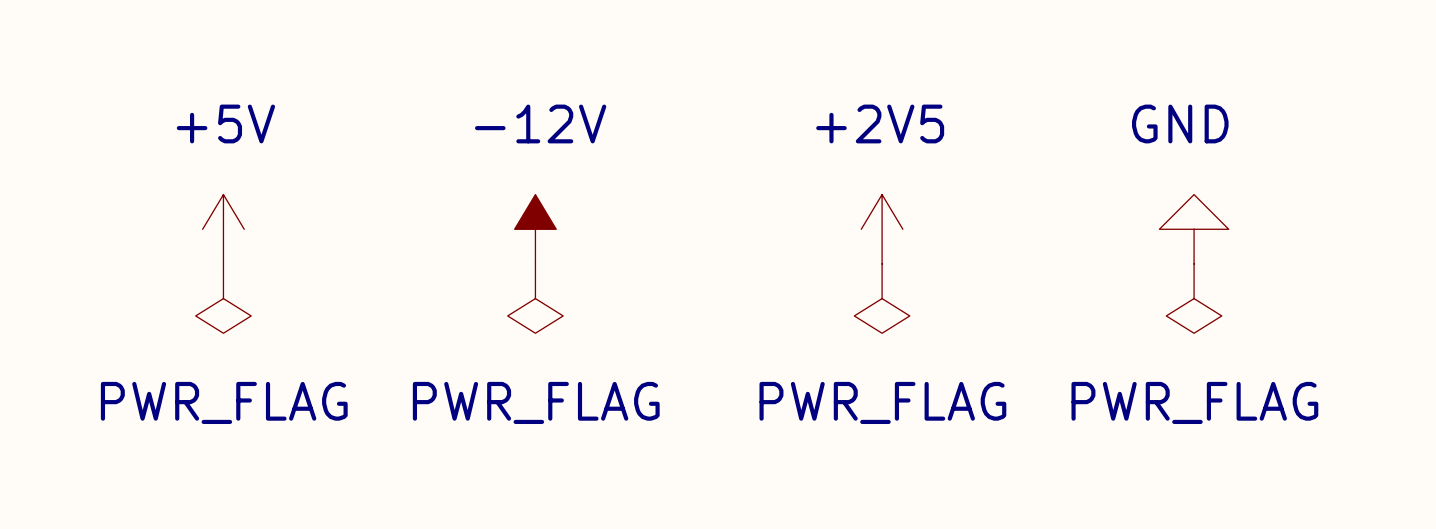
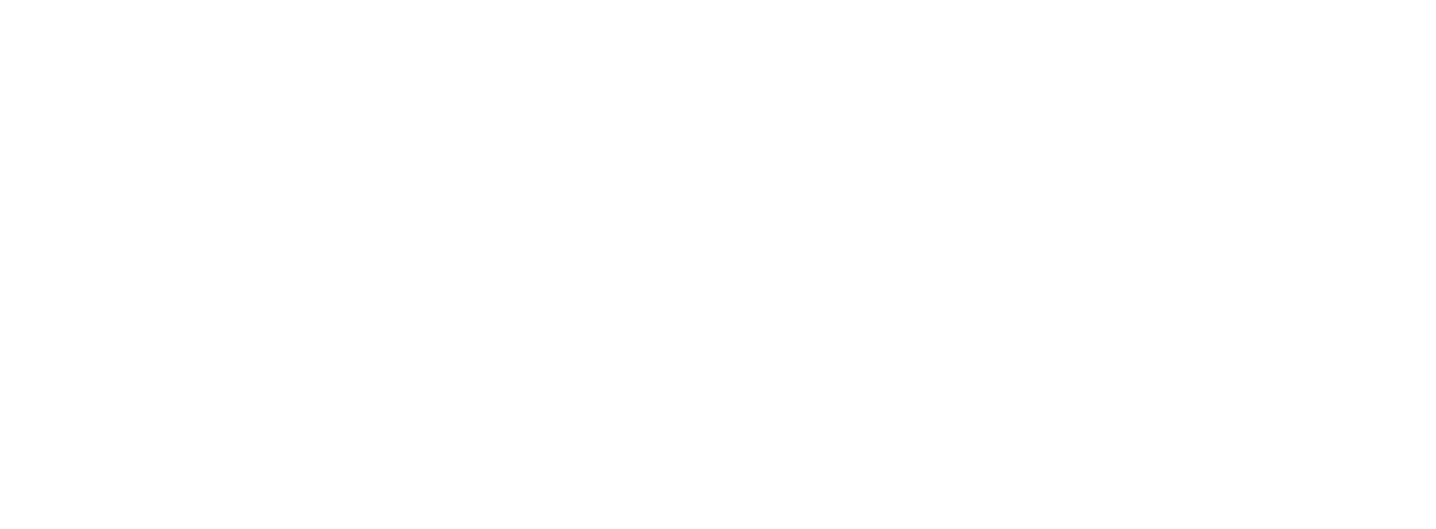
power symbol: +5V (223, 229) -> none
power symbol: -12V (535, 229) -> none
power symbol: +2V5 (882, 229) -> none
power symbol: GND (1194, 229) -> none
power symbol: PWR_FLAG (223, 298) -> none
power symbol: PWR_FLAG (535, 298) -> none
power symbol: PWR_FLAG (882, 298) -> none
power symbol: PWR_FLAG (1194, 298) -> none

